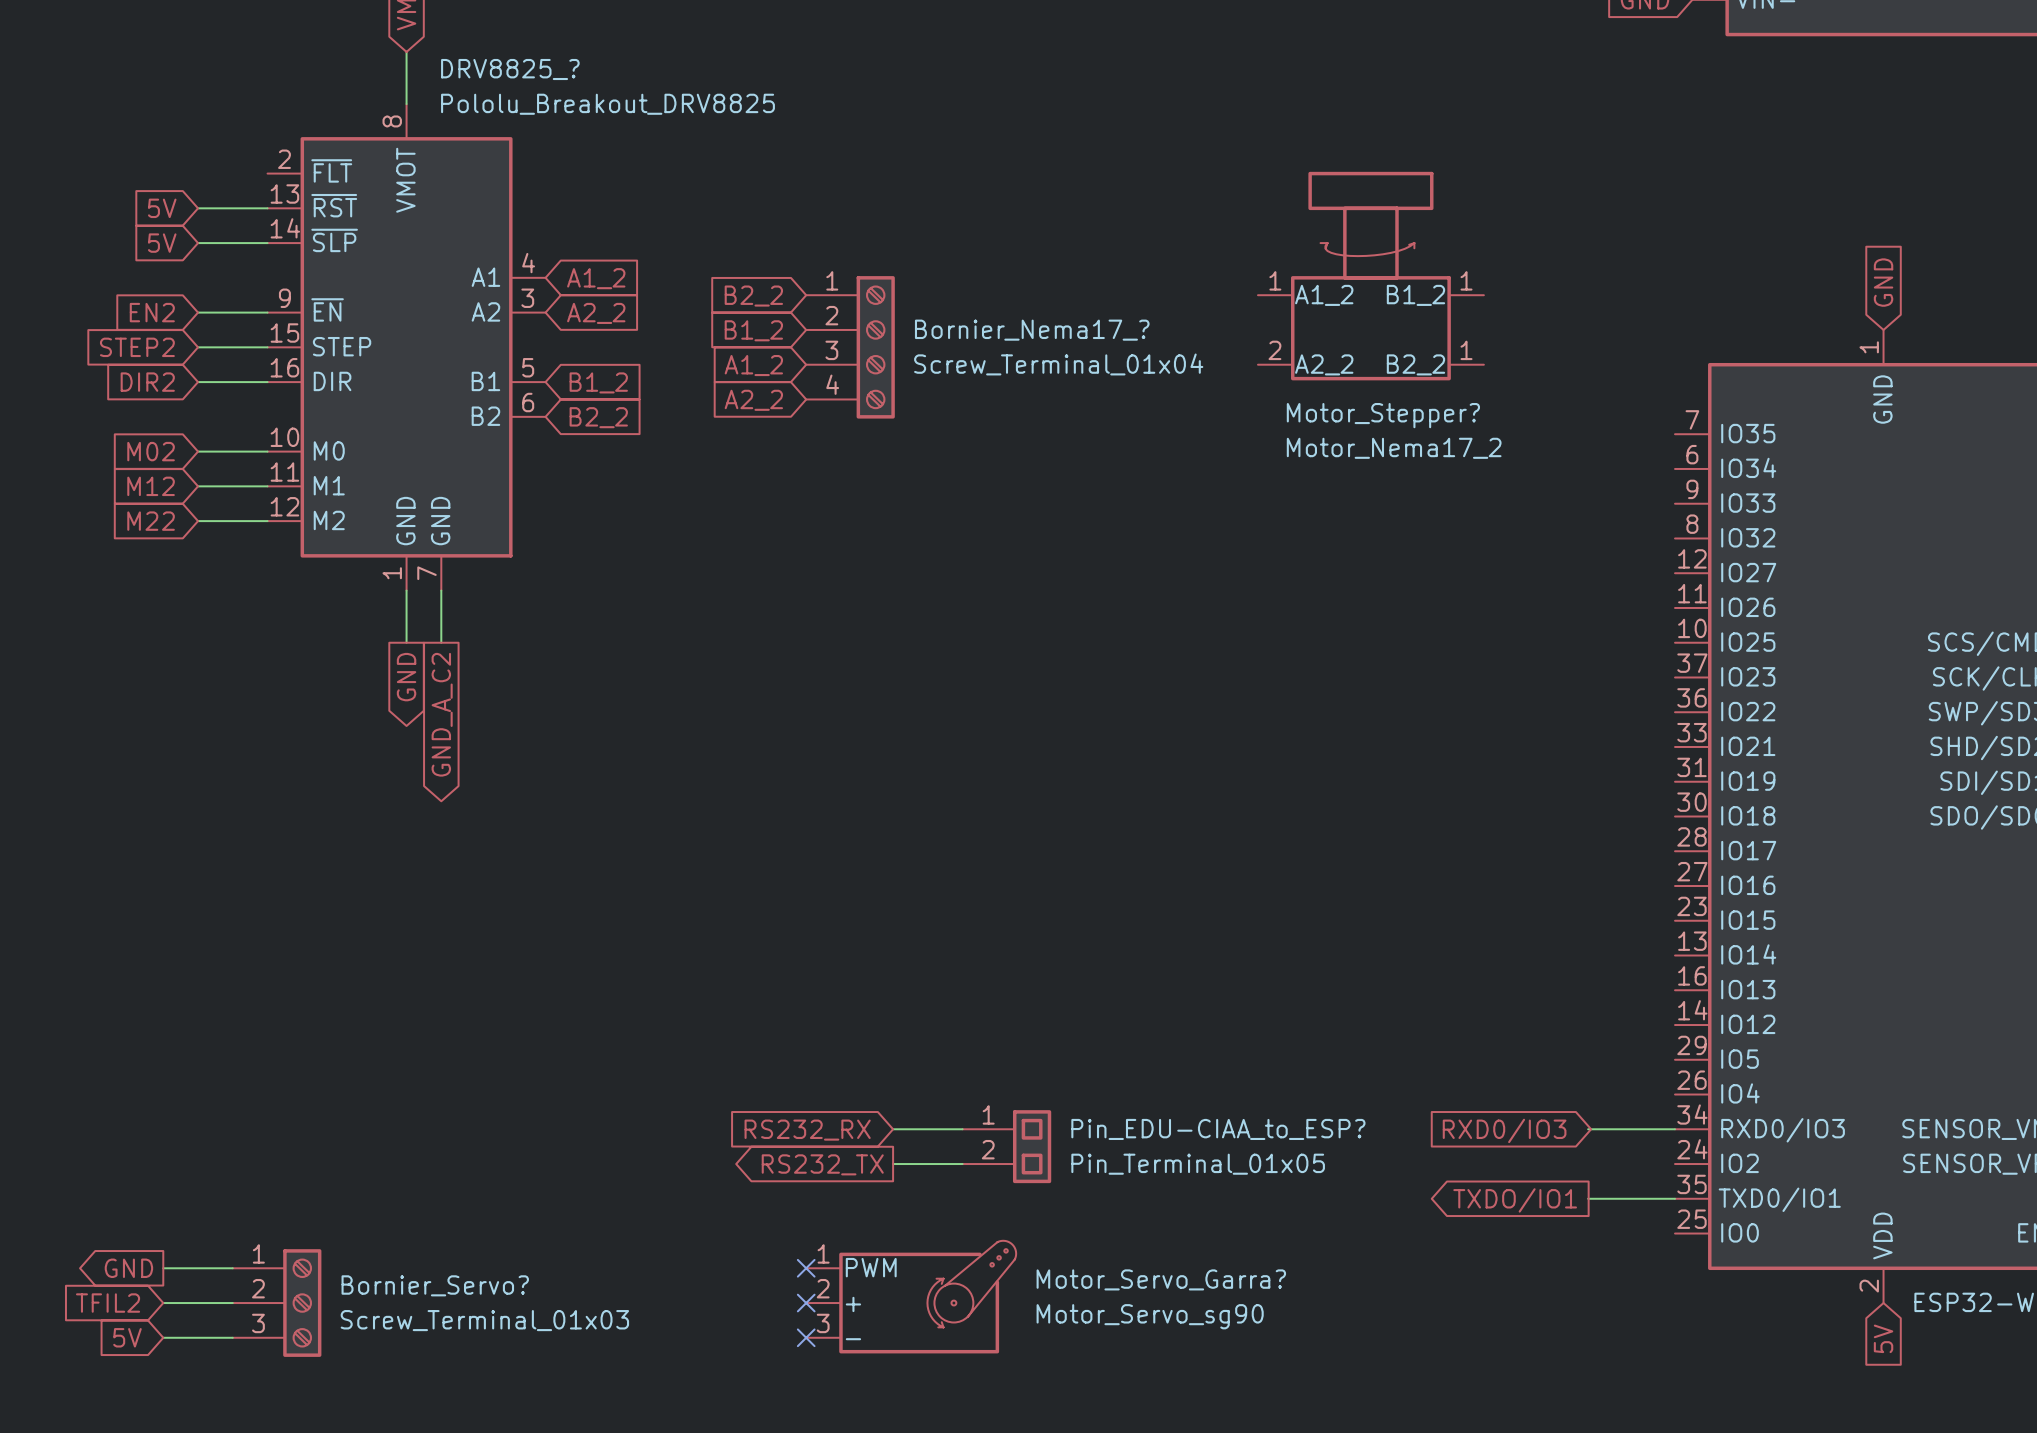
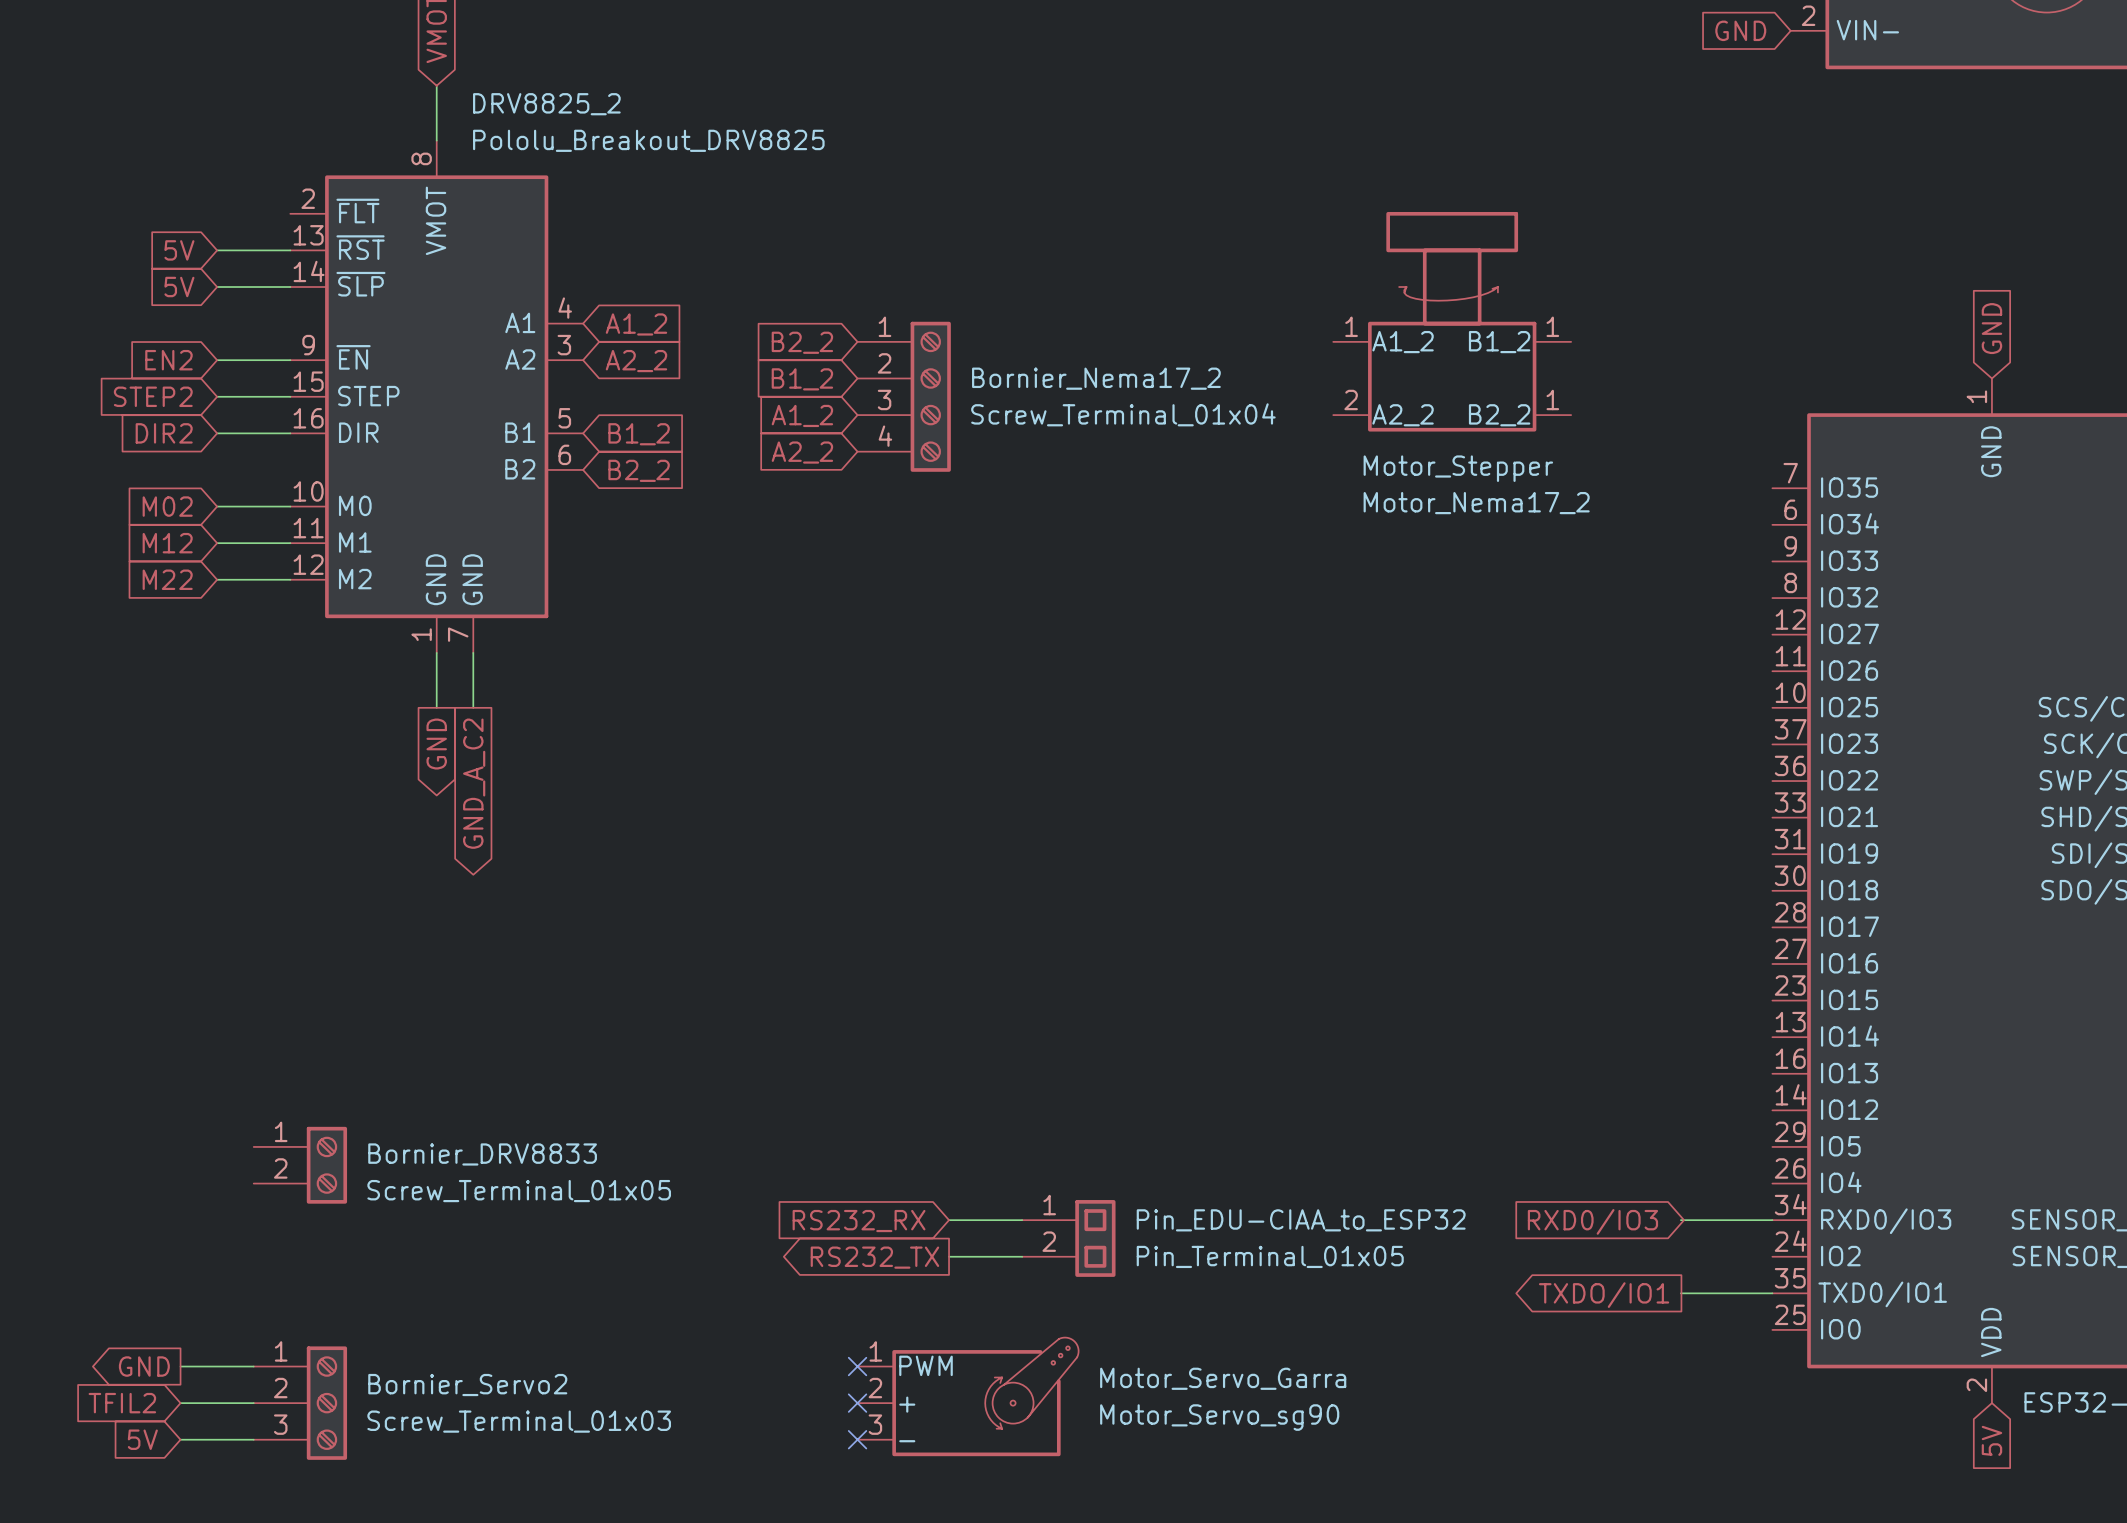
DRV8825_? name: DRV8825_? (510, 69) -> DRV8825_2 (546, 104)
Bornier_Nema17_? name: Bornier_Nema17_? (1032, 330) -> Bornier_Nema17_2 (1096, 378)
Motor_Stepper? name: Motor_Stepper? (1383, 415) -> Motor_Stepper (1458, 468)
Bornier_DRV8833: none -> Screw_Terminal_01x05 (300, 1165)
Pin_EDU-CIAA_to_ESP? name: Pin_EDU-CIAA_to_ESP? (1218, 1129) -> Pin_EDU-CIAA_to_ESP32 (1301, 1220)
Motor_Servo_Garra? name: Motor_Servo_Garra? (1161, 1279) -> Motor_Servo_Garra (1223, 1378)
Bornier_Servo? name: Bornier_Servo? (435, 1285) -> Bornier_Servo2 (467, 1385)

